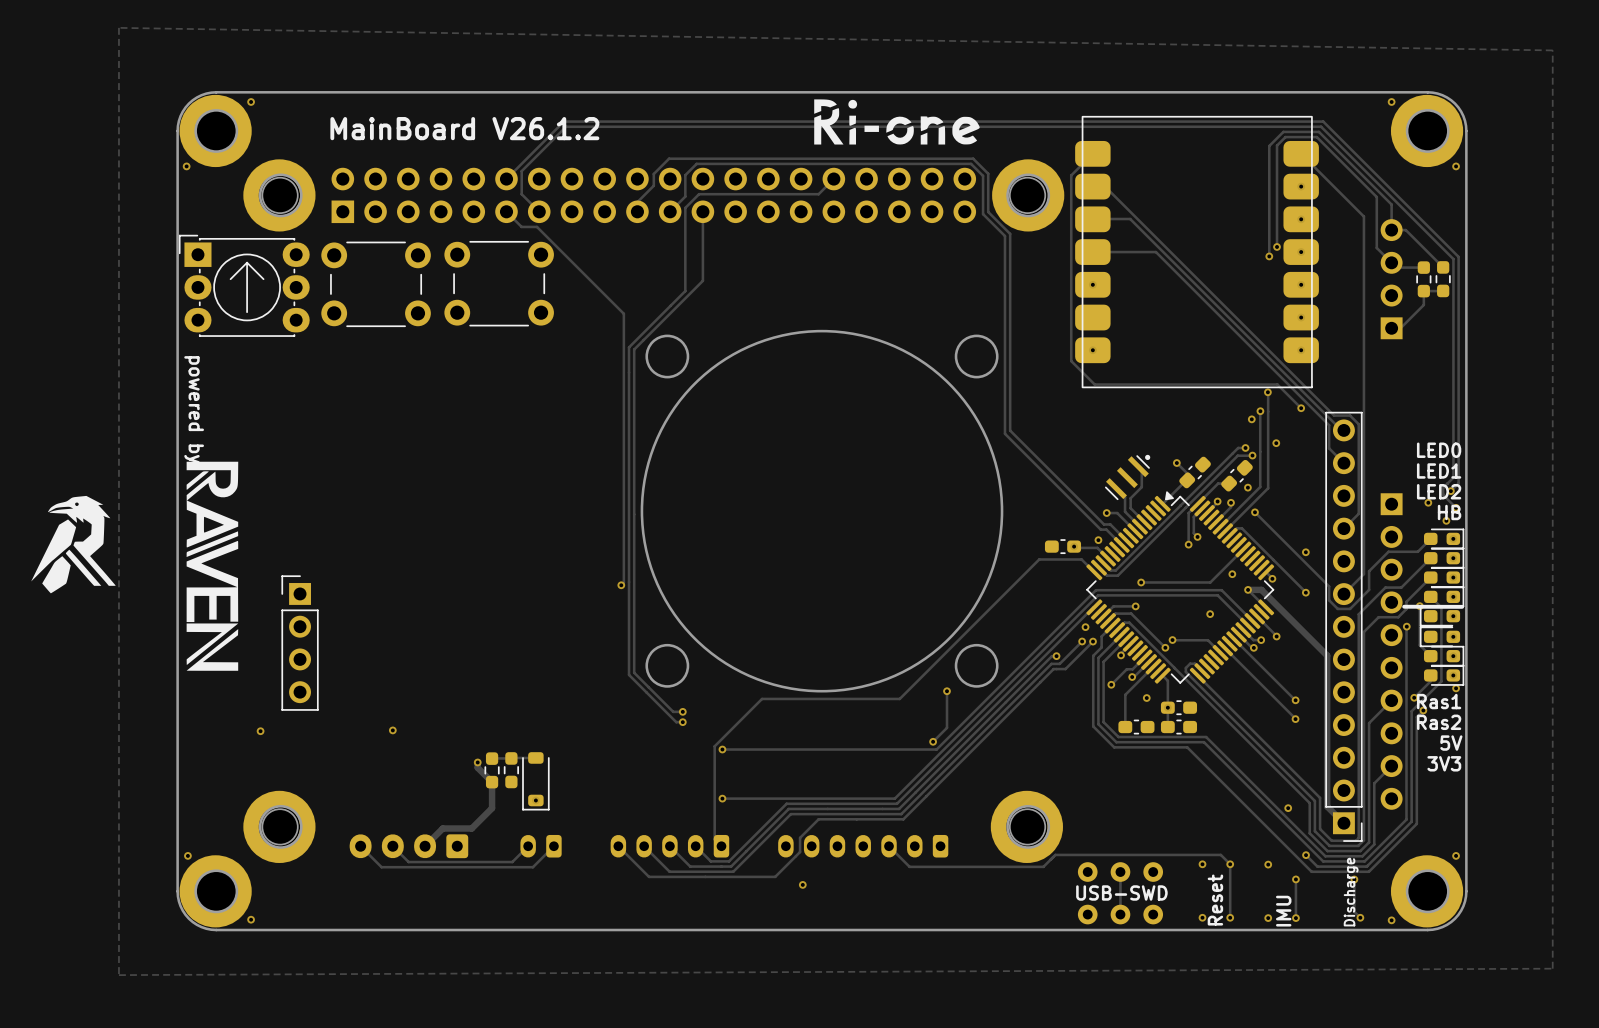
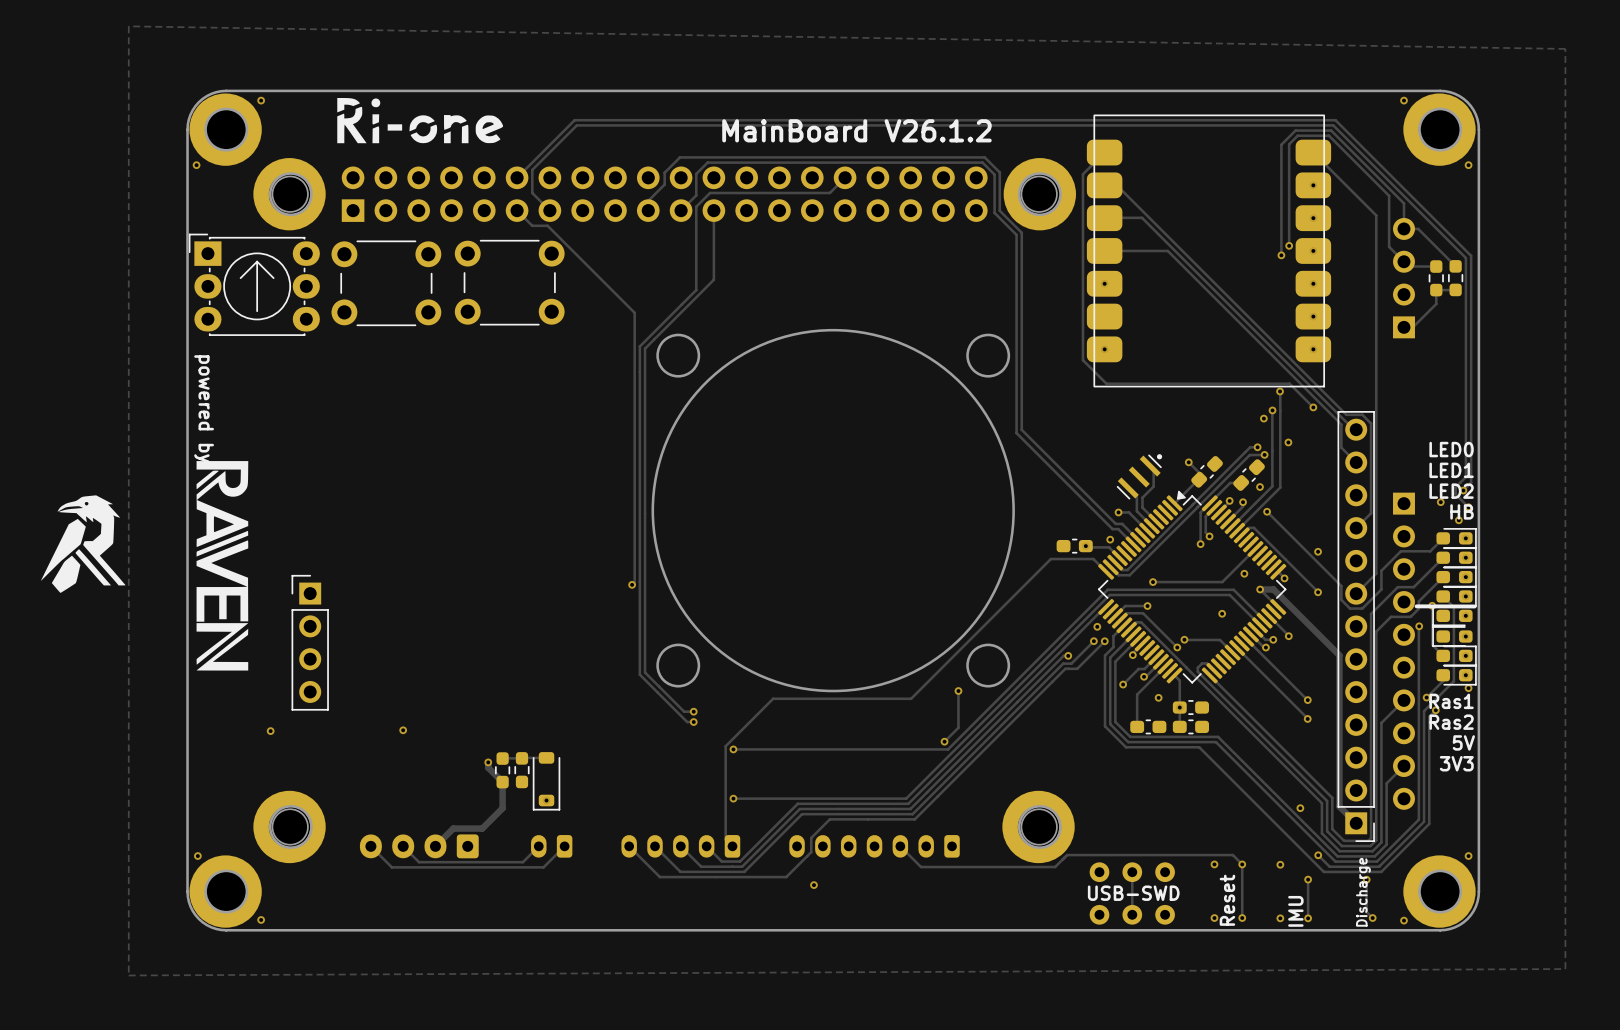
drawing: none -> [337, 98, 504, 144]
drawing: [814, 99, 980, 145] -> none
text: MainBoard V26.1.2 (464, 128) -> none
text: none -> MainBoard V26.1.2 (856, 130)

